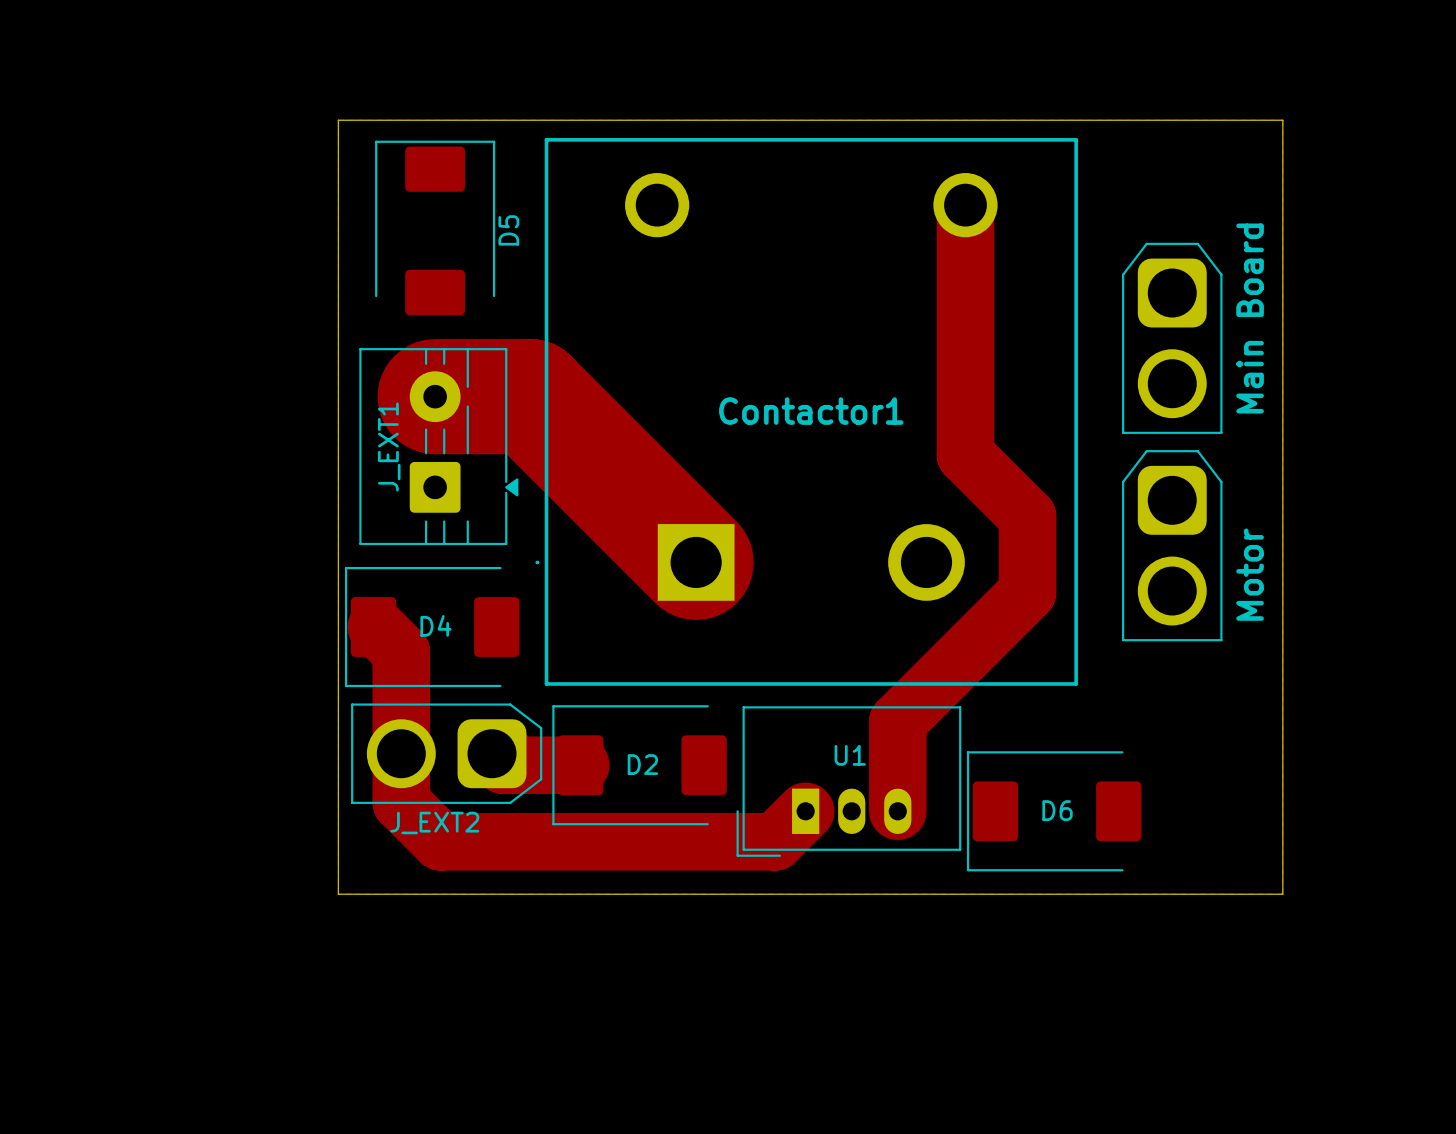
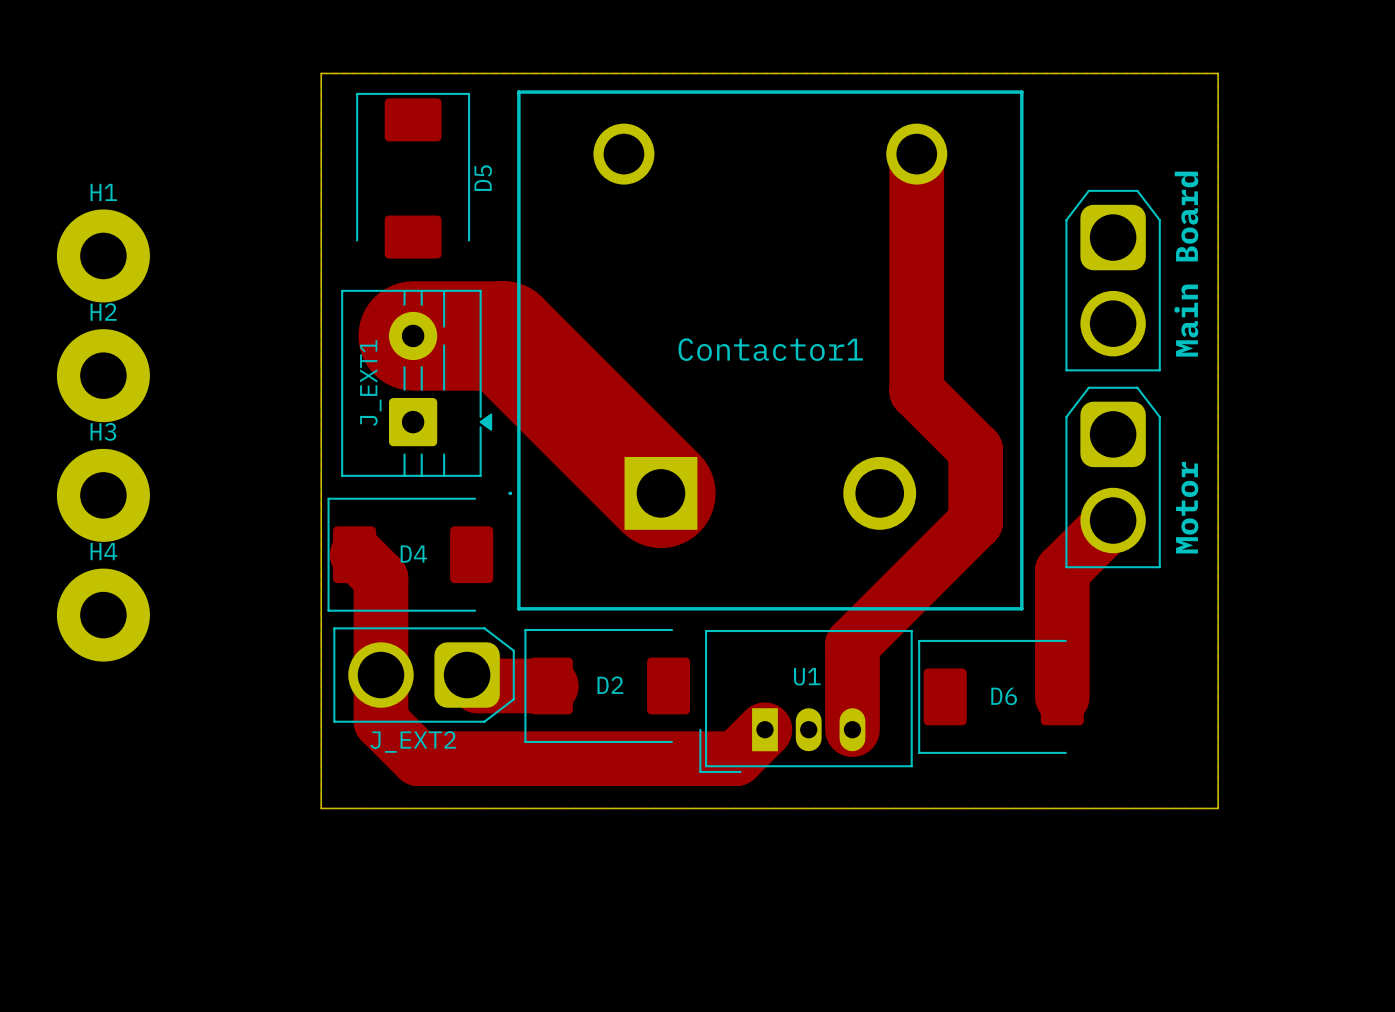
H1: none -> (103, 255)
H2: none -> (103, 375)
H3: none -> (103, 495)
track: none -> (1113, 520) (1062, 571) (1062, 696)
H4: none -> (103, 615)
D6 position: (1054, 811) -> (1000, 696)

